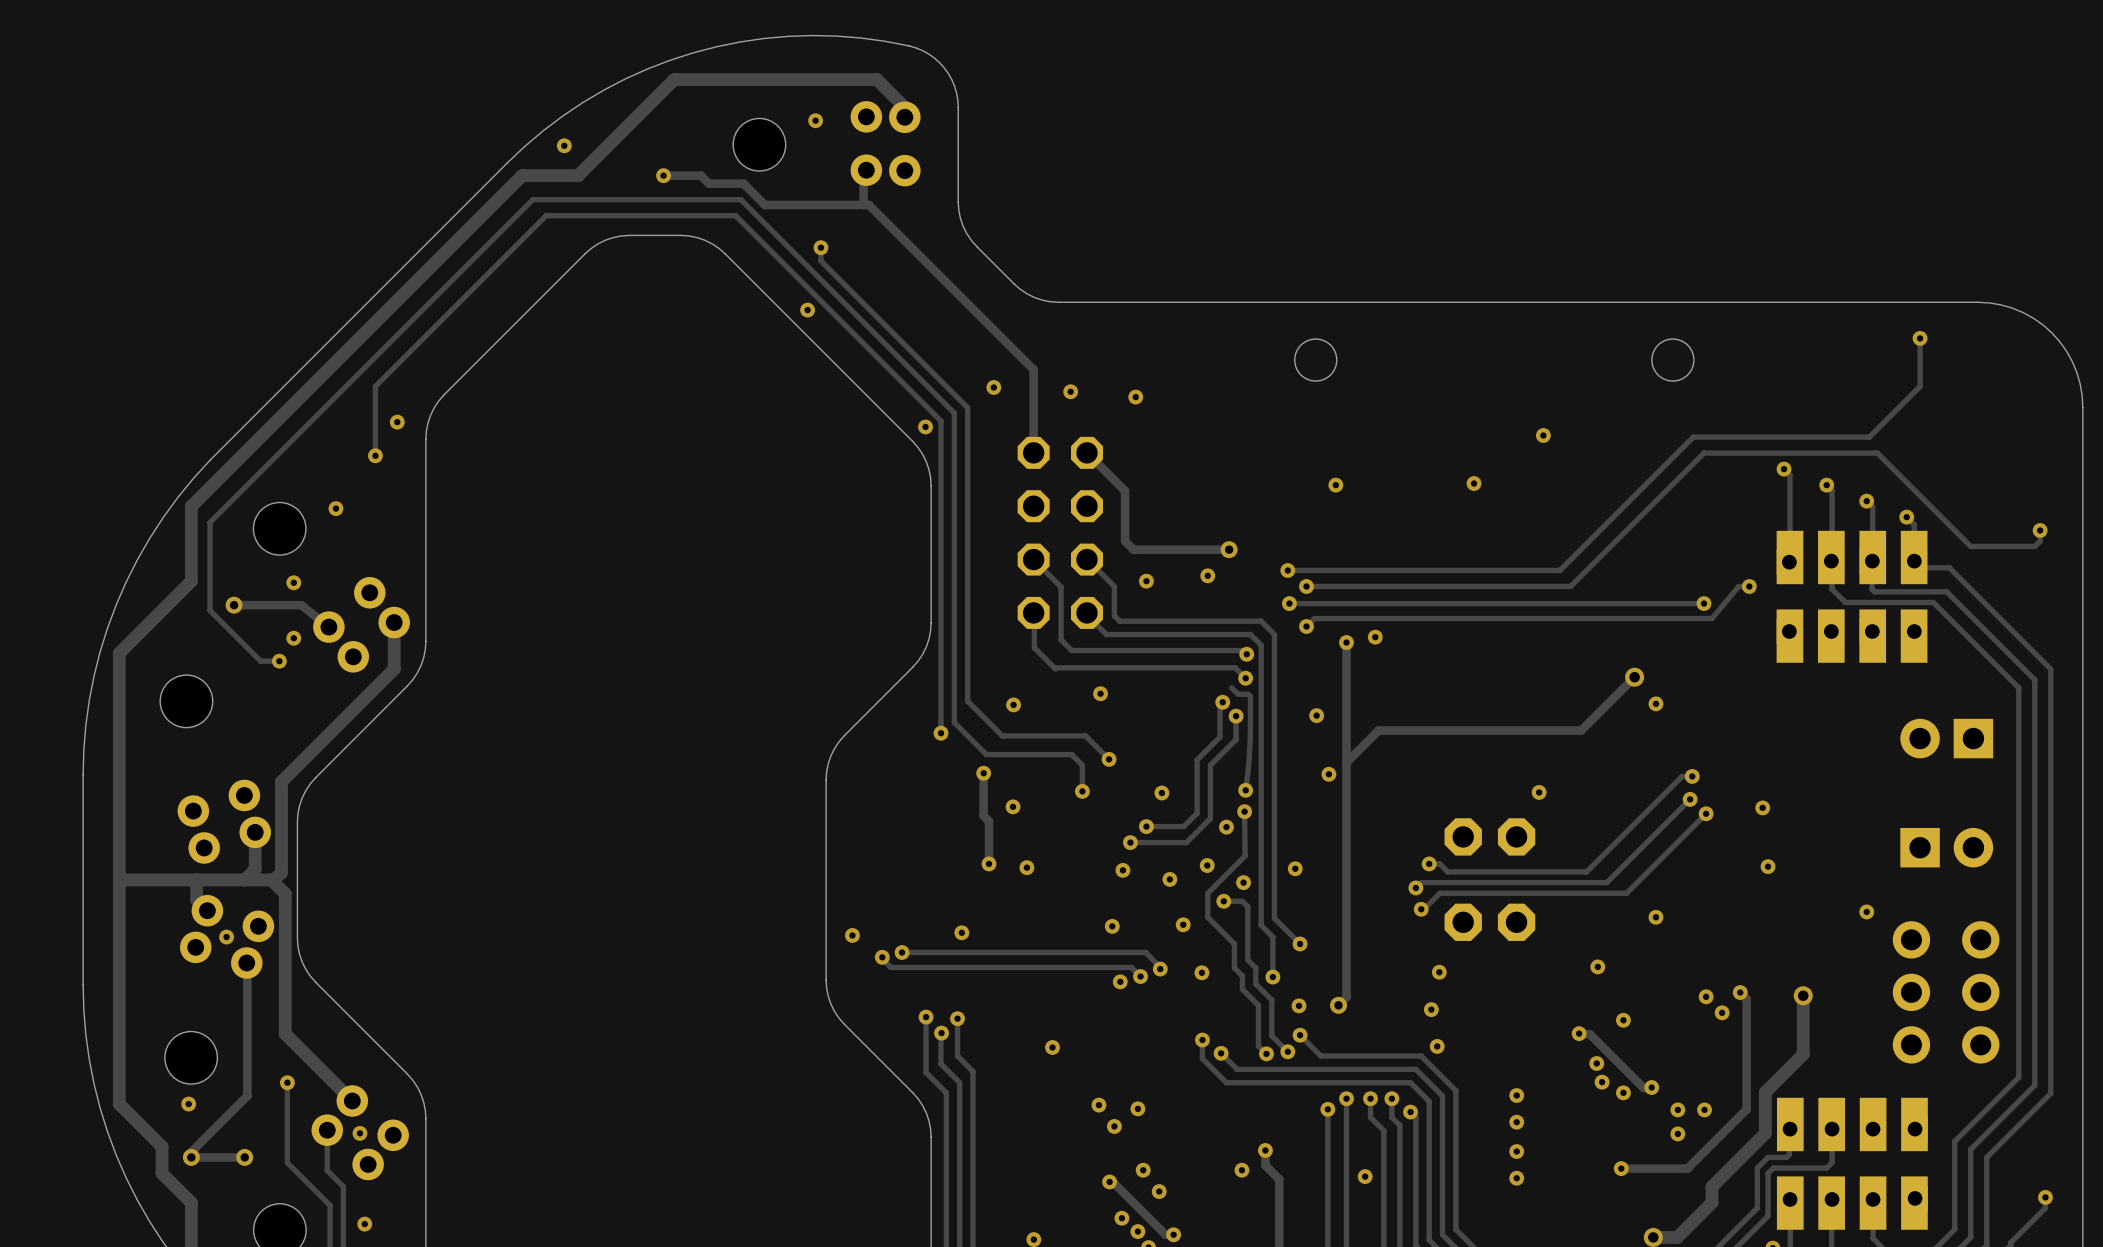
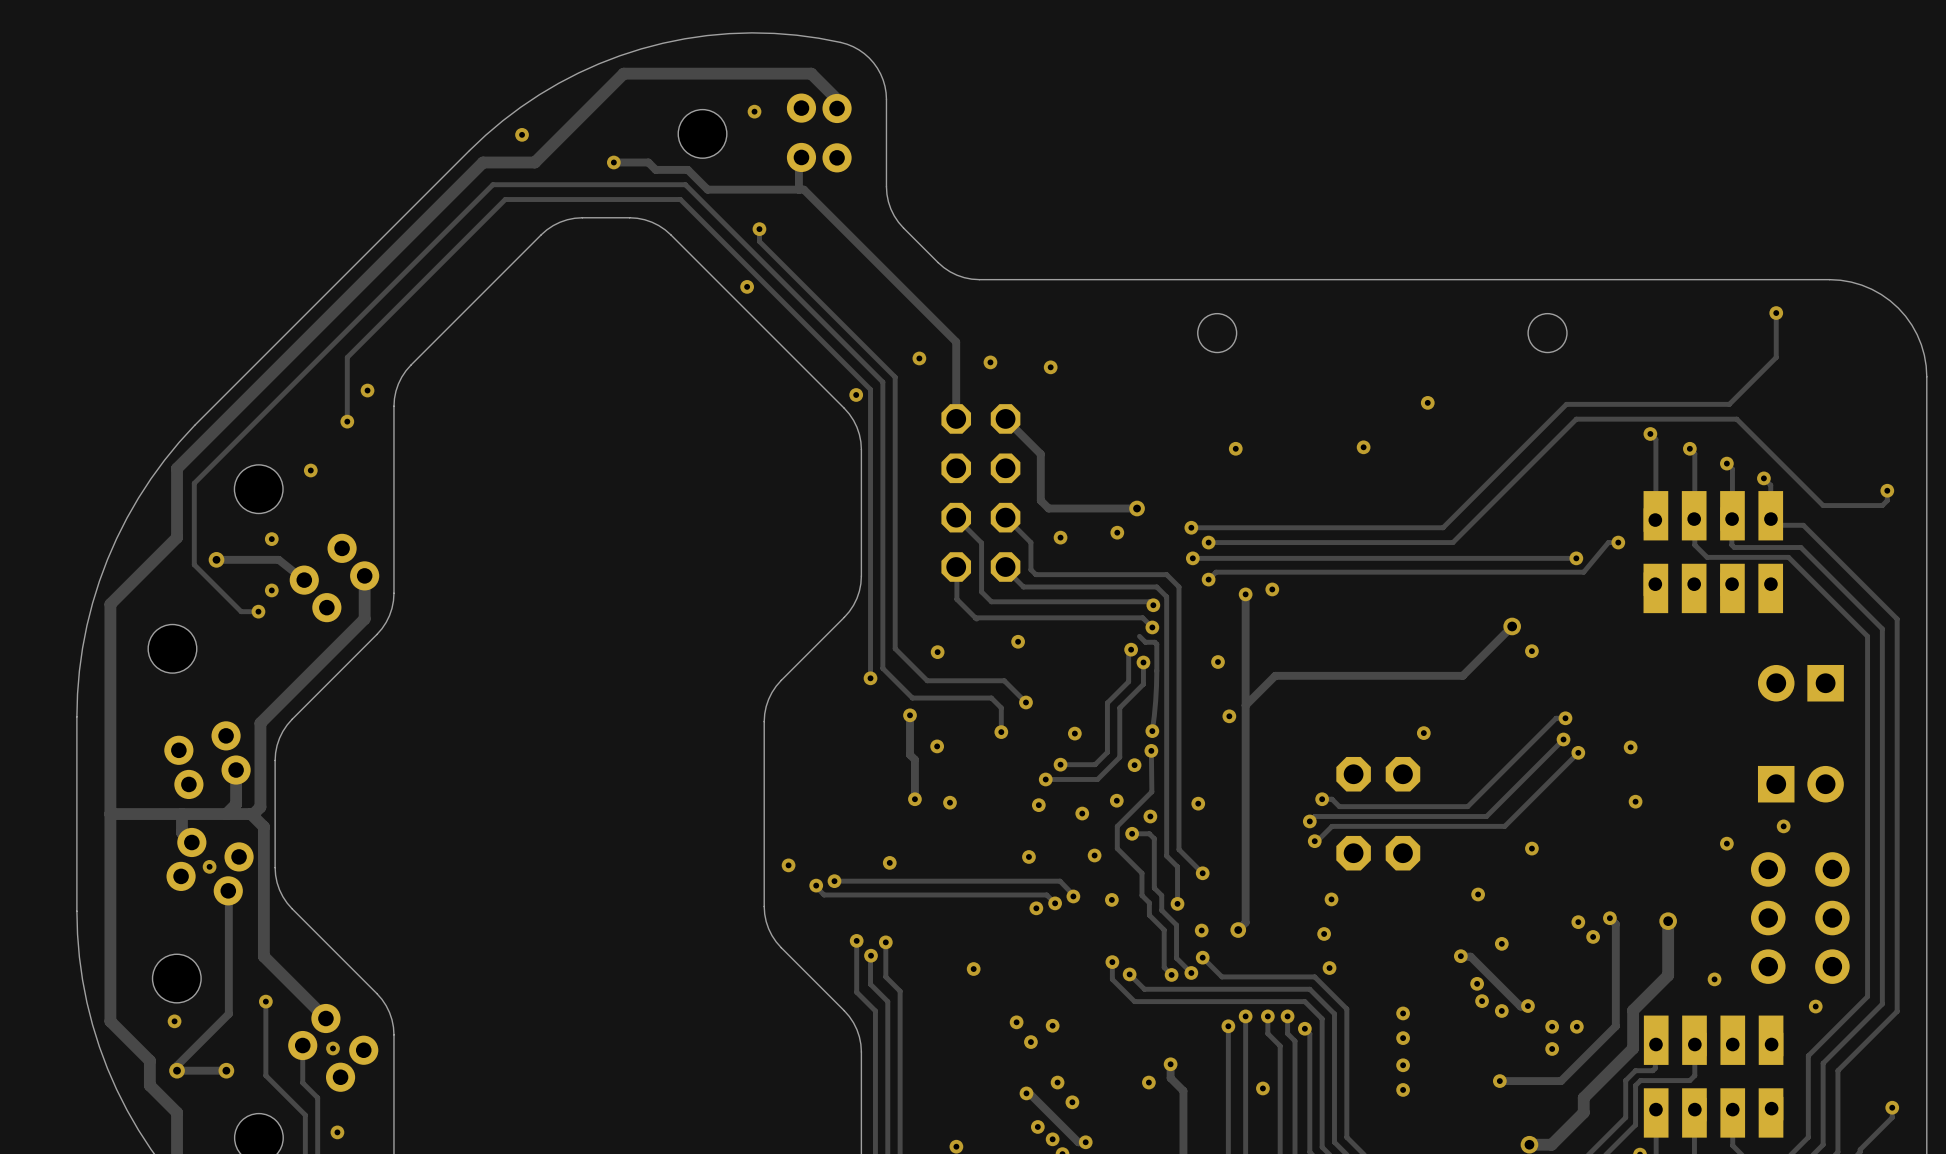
via: none -> (1783, 826)
via: none -> (1714, 979)
via: none -> (1815, 1006)

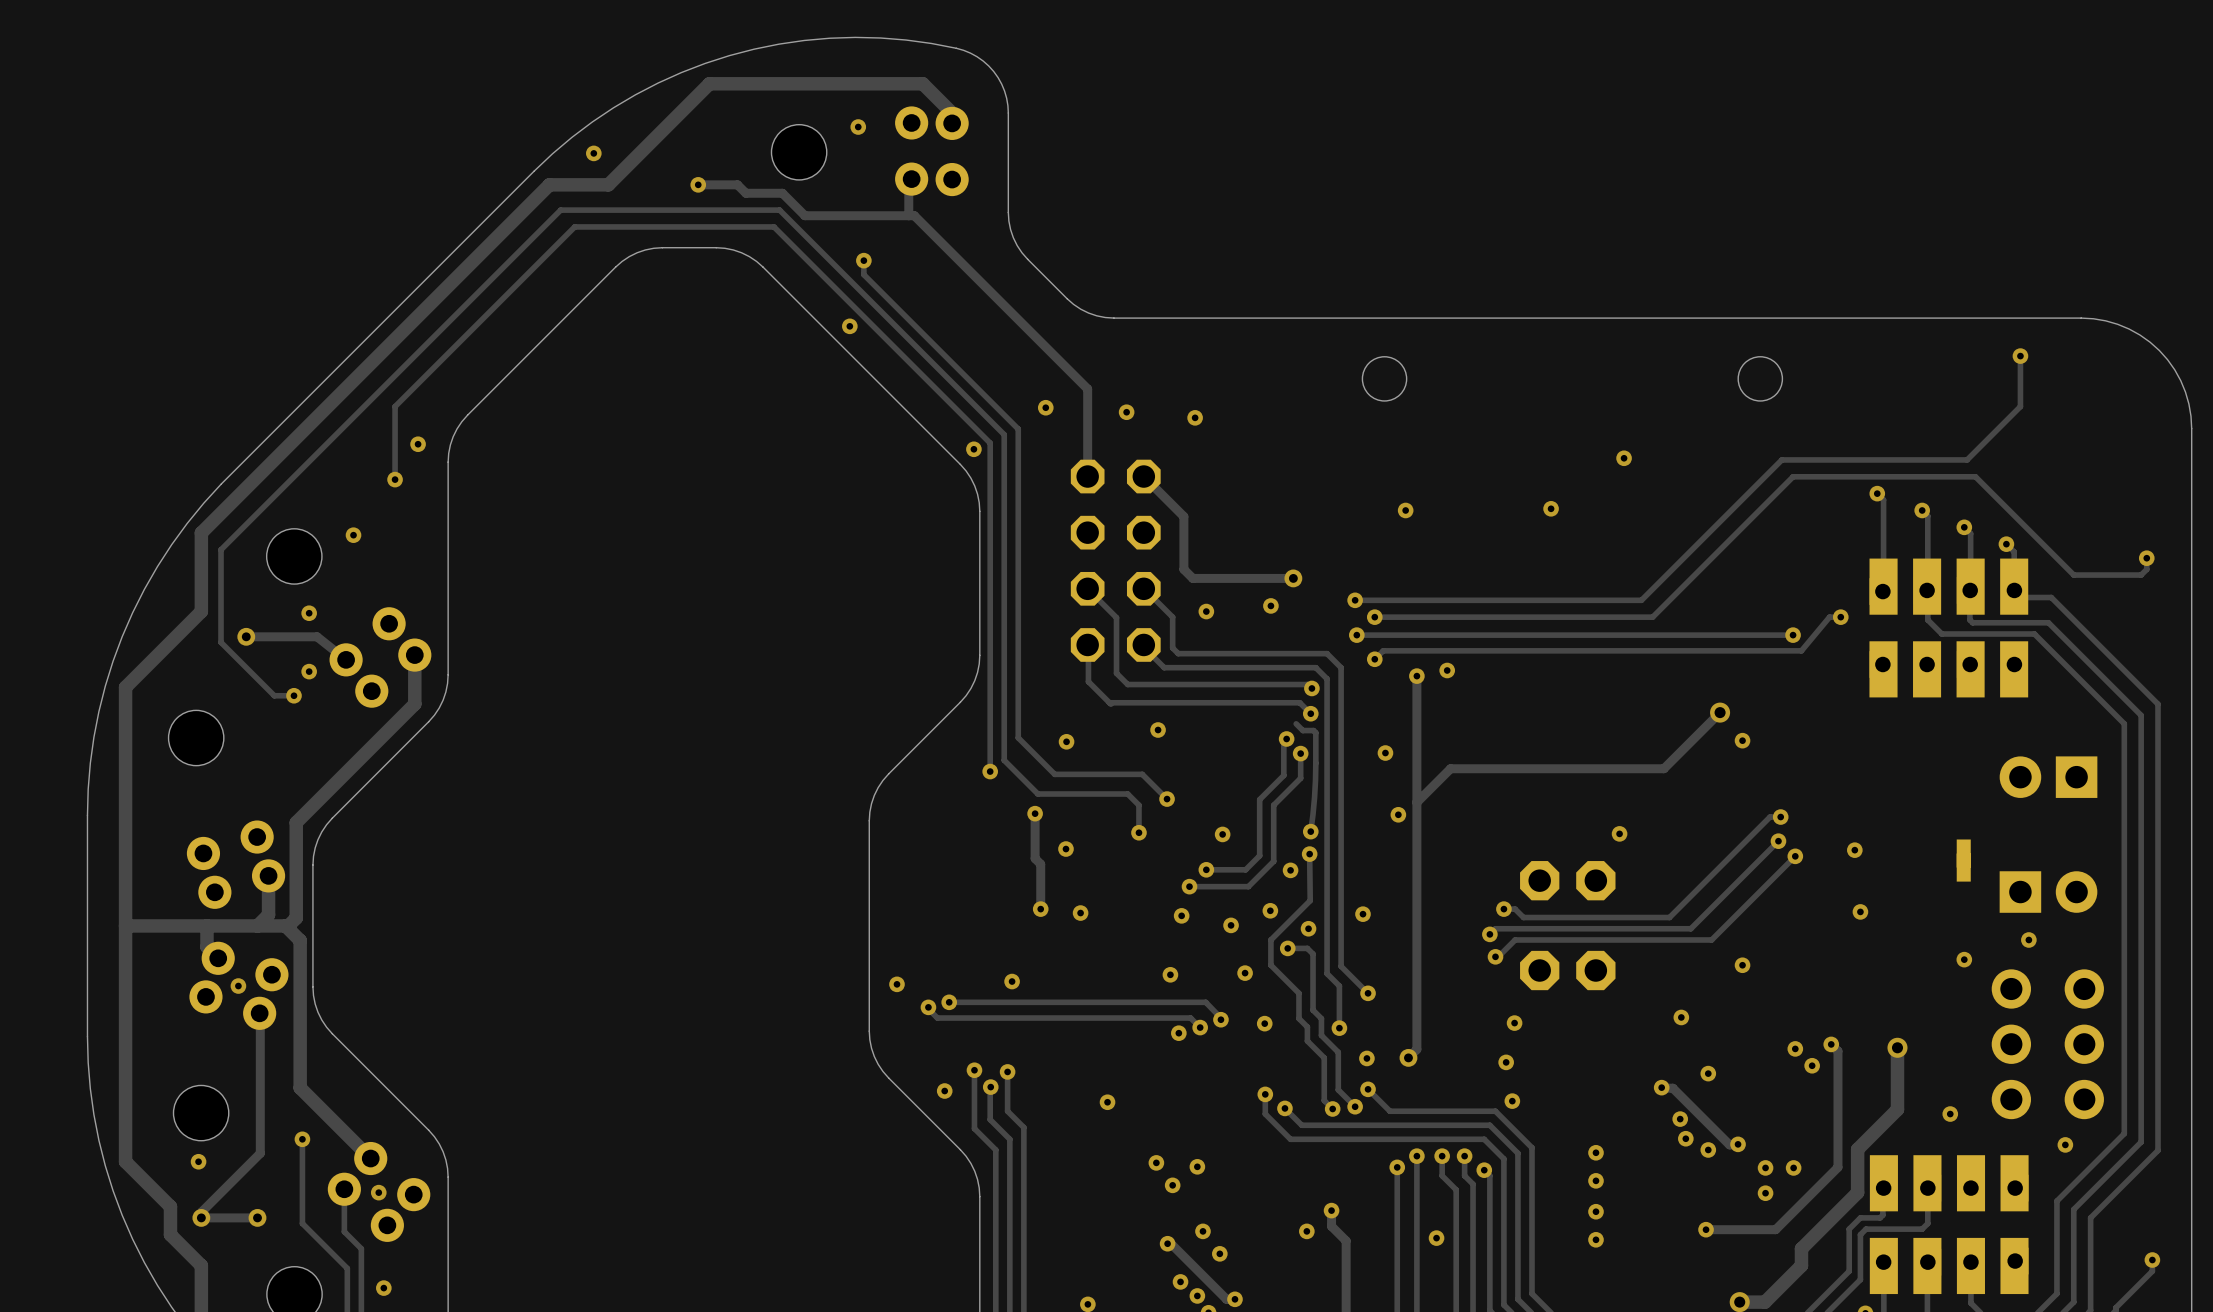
part: none -> (1963, 860)
via: none -> (944, 1091)

